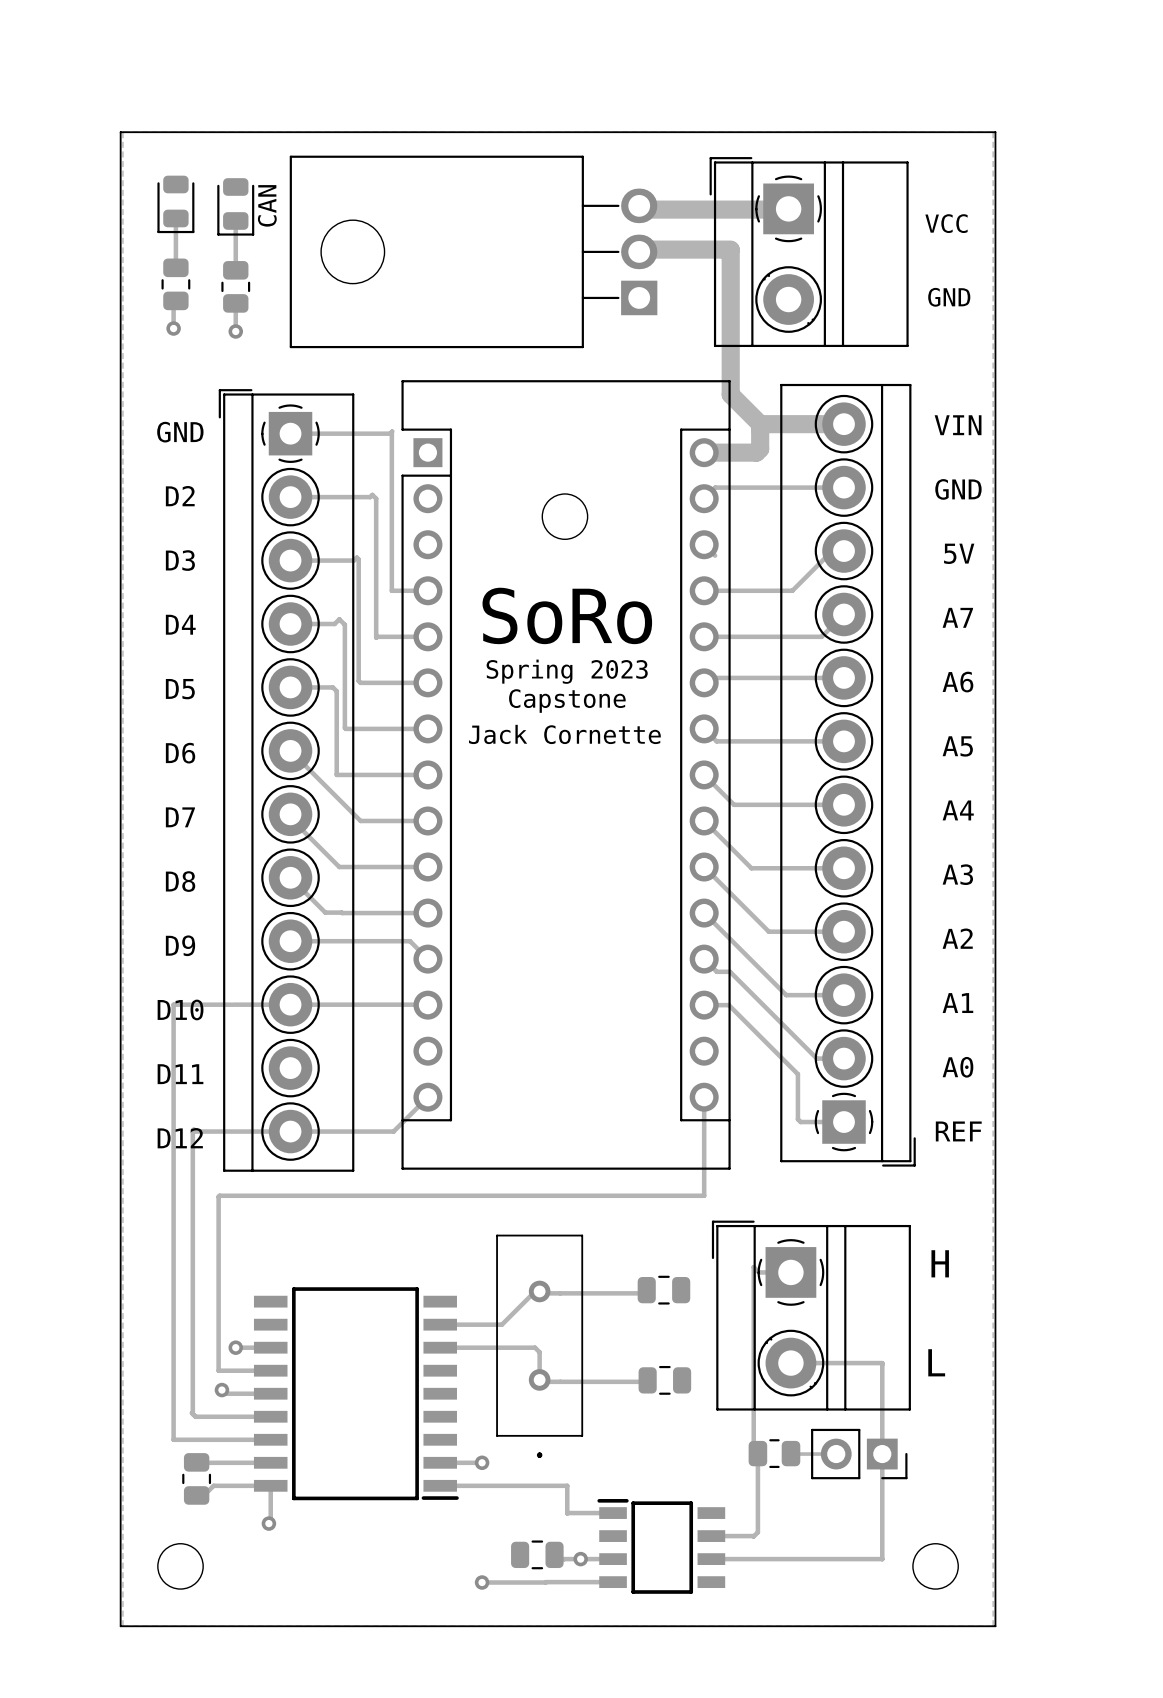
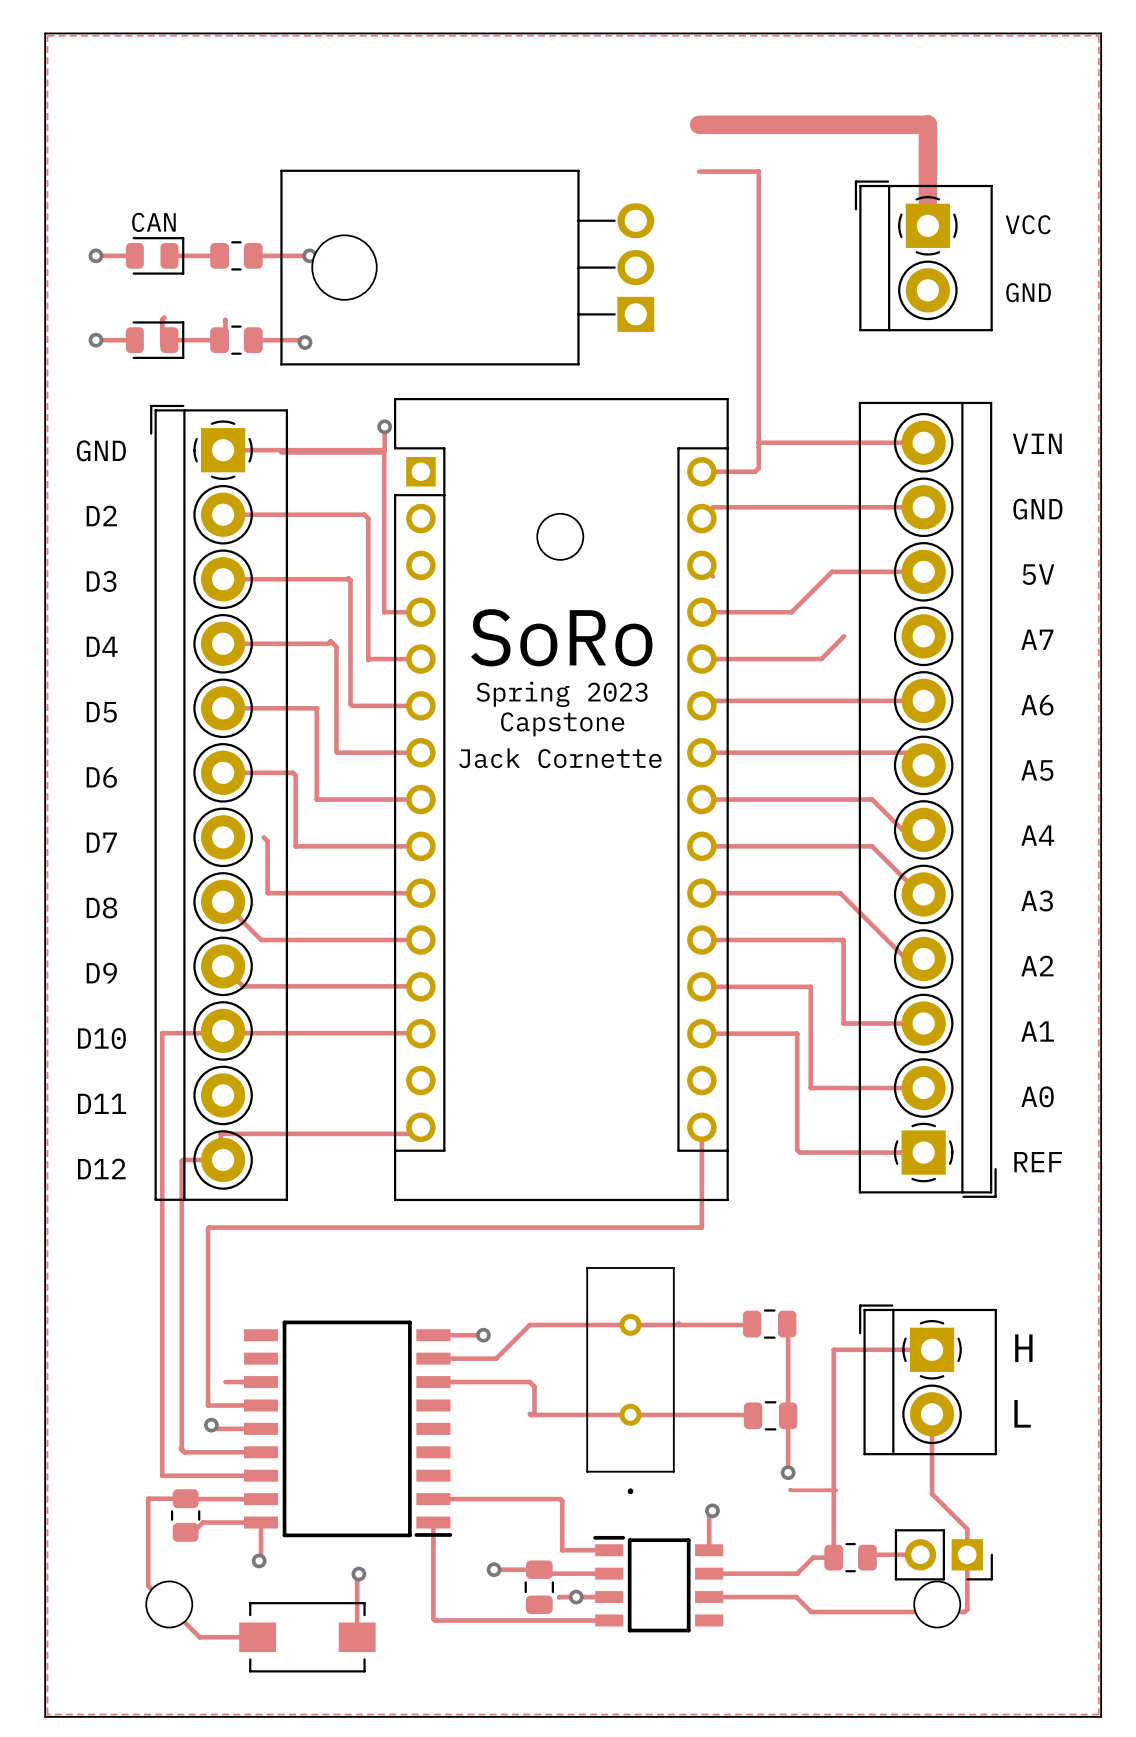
track: none -> (928, 123) (699, 124)
track: none -> (927, 124) (927, 225)
board edge: (120, 132) (995, 132) (995, 1626) (120, 1626) (120, 132) -> (45, 33) (45, 1716) (1101, 1716) (1101, 33) (45, 33)
zone outline: (122, 132) (122, 1626) (993, 1626) (993, 132) (122, 132) -> (47, 35) (47, 1714) (1098, 1714) (1098, 35) (47, 35)
track: (808, 189) (787, 209) (642, 209) (639, 205) (689, 205) (692, 203) -> none
part rotation: 0° (175, 204) -> 90° counterclockwise (155, 340)
part position: (175, 204) -> (155, 340)
CAN rotation: 0° (235, 206) -> 90° counterclockwise (155, 255)
CAN position: (235, 206) -> (155, 255)
track: (175, 218) (175, 267) -> none
track: (235, 220) (235, 270) -> none
text position: VCC (946, 223) -> VCC (1028, 224)
track: none -> (95, 255) (134, 255)
via: none -> (95, 255)
track: none -> (169, 255) (219, 255)
part: none -> (236, 255)
track: none -> (253, 255) (309, 255)
via: none -> (309, 255)
part: none -> (923, 255)
track: (730, 249) (641, 249) (639, 251) -> none
track: (730, 250) (730, 394) (760, 424) -> (699, 171) (758, 171) (758, 442)
part: (809, 252) -> none
part: (175, 284) -> none
part: (235, 286) -> none
text position: GND (949, 297) -> GND (1028, 292)
track: none -> (95, 340) (134, 340)
via: none -> (95, 340)
track: none -> (169, 340) (219, 340)
part: none -> (236, 340)
track: none -> (255, 342) (253, 340) (302, 340) (305, 342)
via: none -> (305, 342)
via: (173, 328) -> none
via: (235, 331) -> none
track: none -> (384, 426) (384, 450) (223, 450)
via: none -> (384, 426)
track: none -> (844, 442) (923, 442)
track width: thick (844, 424) (760, 424) (760, 448) (756, 452) (704, 452) -> thin (844, 442) (758, 442) (758, 468) (755, 471) (701, 471)
text position: VIN (958, 425) -> VIN (1037, 443)
text position: GND (180, 432) -> GND (101, 450)
track: none -> (844, 507) (923, 507)
text position: GND (958, 489) -> GND (1037, 509)
track: (372, 494) (370, 497) (290, 497) -> (364, 514) (223, 514)
text position: D2 (180, 496) -> D2 (101, 515)
track: none -> (832, 571) (923, 571)
text position: 5V (959, 553) -> 5V (1038, 574)
track: (356, 558) (353, 560) (290, 560) -> (347, 579) (223, 579)
text position: D3 (180, 560) -> D3 (101, 581)
text position: A7 (957, 617) -> A7 (1037, 639)
track: (336, 621) (334, 624) (290, 624) -> (328, 643) (223, 643)
text position: D4 (180, 624) -> D4 (102, 646)
track: none -> (844, 700) (923, 700)
text position: A6 (957, 682) -> A6 (1037, 705)
track: (290, 687) (332, 687) (336, 691) (337, 774) -> (223, 708) (317, 708) (316, 799) (328, 799)
text position: D5 (180, 689) -> D5 (101, 712)
track: (704, 728) (716, 741) (844, 741) -> (701, 752) (910, 752) (923, 765)
text position: A5 (957, 746) -> A5 (1037, 770)
track: none -> (223, 772) (292, 772)
track: (290, 750) (360, 820) -> (295, 775) (295, 846) (352, 846)
text position: D6 (180, 753) -> D6 (101, 777)
track: (704, 774) (734, 804) (844, 804) -> (701, 799) (872, 799) (902, 829) (923, 829)
part position: (847, 775) -> (927, 799)
part position: (286, 780) -> (219, 802)
text position: A4 (958, 810) -> A4 (1037, 835)
track: (290, 814) (290, 818) (339, 867) -> (268, 893) (330, 893)
track: none -> (267, 841) (267, 892)
text position: D7 (180, 817) -> D7 (101, 842)
track: (704, 820) (751, 868) (844, 868) -> (701, 846) (872, 846) (920, 894) (923, 894)
track: (704, 867) (768, 931) (844, 931) -> (701, 893) (840, 893) (906, 958) (923, 958)
text position: A3 (957, 874) -> A3 (1037, 900)
track: (290, 877) (325, 912) (342, 913) -> (223, 901) (261, 940) (333, 940)
text position: D8 (180, 881) -> D8 (101, 907)
track: (704, 913) (786, 995) (843, 995) -> (701, 940) (843, 940)
track: none -> (843, 940) (843, 1023)
text position: A2 (957, 938) -> A2 (1037, 966)
track: (290, 941) (410, 941) (427, 958) -> (223, 966) (243, 986) (420, 986)
text position: D9 (180, 945) -> D9 (101, 973)
track: (712, 967) (716, 971) (730, 971) (816, 1058) -> (701, 986) (810, 986) (810, 1088) (816, 1088)
track: none -> (844, 1023) (923, 1023)
text position: A1 (957, 1003) -> A1 (1037, 1031)
track: (728, 1005) (797, 1074) -> (726, 1033) (797, 1033) (797, 1103)
text position: D10 (180, 1009) -> D10 (101, 1038)
track: none -> (842, 1088) (923, 1088)
text position: A0 (957, 1067) -> A0 (1037, 1096)
text position: D11 (180, 1074) -> D11 (102, 1103)
track: (421, 1103) (393, 1131) (192, 1132) -> (414, 1133) (220, 1133) (220, 1157) (223, 1159) (182, 1159)
track: none -> (844, 1152) (923, 1152)
text position: REF (958, 1131) -> REF (1038, 1162)
text position: D12 (180, 1138) -> D12 (101, 1168)
text position: H (940, 1263) -> H (1023, 1348)
track: (790, 1272) (759, 1272) (753, 1267) (753, 1449) (757, 1453) (757, 1532) (753, 1536) -> (932, 1349) (833, 1349) (833, 1557) (813, 1557) (797, 1573) (751, 1573)
track: (646, 1290) (643, 1293) (533, 1293) -> (752, 1324) (529, 1325) (528, 1326)
part: (663, 1290) -> none
part: none -> (769, 1324)
track: none -> (787, 1324) (788, 1472)
track: none -> (433, 1335) (483, 1335)
via: none -> (483, 1335)
part: (811, 1315) -> none
part: none -> (927, 1379)
part position: (539, 1346) -> (630, 1380)
via: (235, 1347) -> none
text position: L (936, 1362) -> L (1022, 1413)
track: (790, 1363) (882, 1363) (882, 1559) -> none
track: (646, 1379) (646, 1381) (537, 1381) (536, 1380) -> (753, 1415) (530, 1414)
part: (664, 1380) -> none
part: none -> (770, 1415)
via: none -> (788, 1472)
part position: (774, 1453) -> (850, 1557)
part position: (859, 1454) -> (943, 1554)
track: none -> (185, 1498) (148, 1499) (148, 1585) (199, 1637) (257, 1637)
via: (482, 1462) -> none
track: none -> (712, 1510) (709, 1514) (709, 1550)
via: none -> (712, 1510)
track: (440, 1485) (567, 1485) (567, 1513) -> (475, 1499) (560, 1499) (562, 1501) (563, 1550)
track: none -> (920, 1554) (870, 1554) (867, 1557)
track: none -> (494, 1569) (539, 1569) (543, 1573) (609, 1573)
via: none -> (494, 1569)
track: none -> (358, 1574) (357, 1575) (357, 1637)
via: none -> (358, 1574)
part rotation: 0° (537, 1554) -> 90° clockwise (539, 1587)
track: (797, 1559) (882, 1559) -> (796, 1597) (811, 1612) (964, 1612) (967, 1609) (967, 1529) (932, 1493) (932, 1414)
via: (482, 1582) -> none
track: (546, 1582) (482, 1582) -> (541, 1620) (434, 1620) (433, 1522)
part: none -> (307, 1637)

